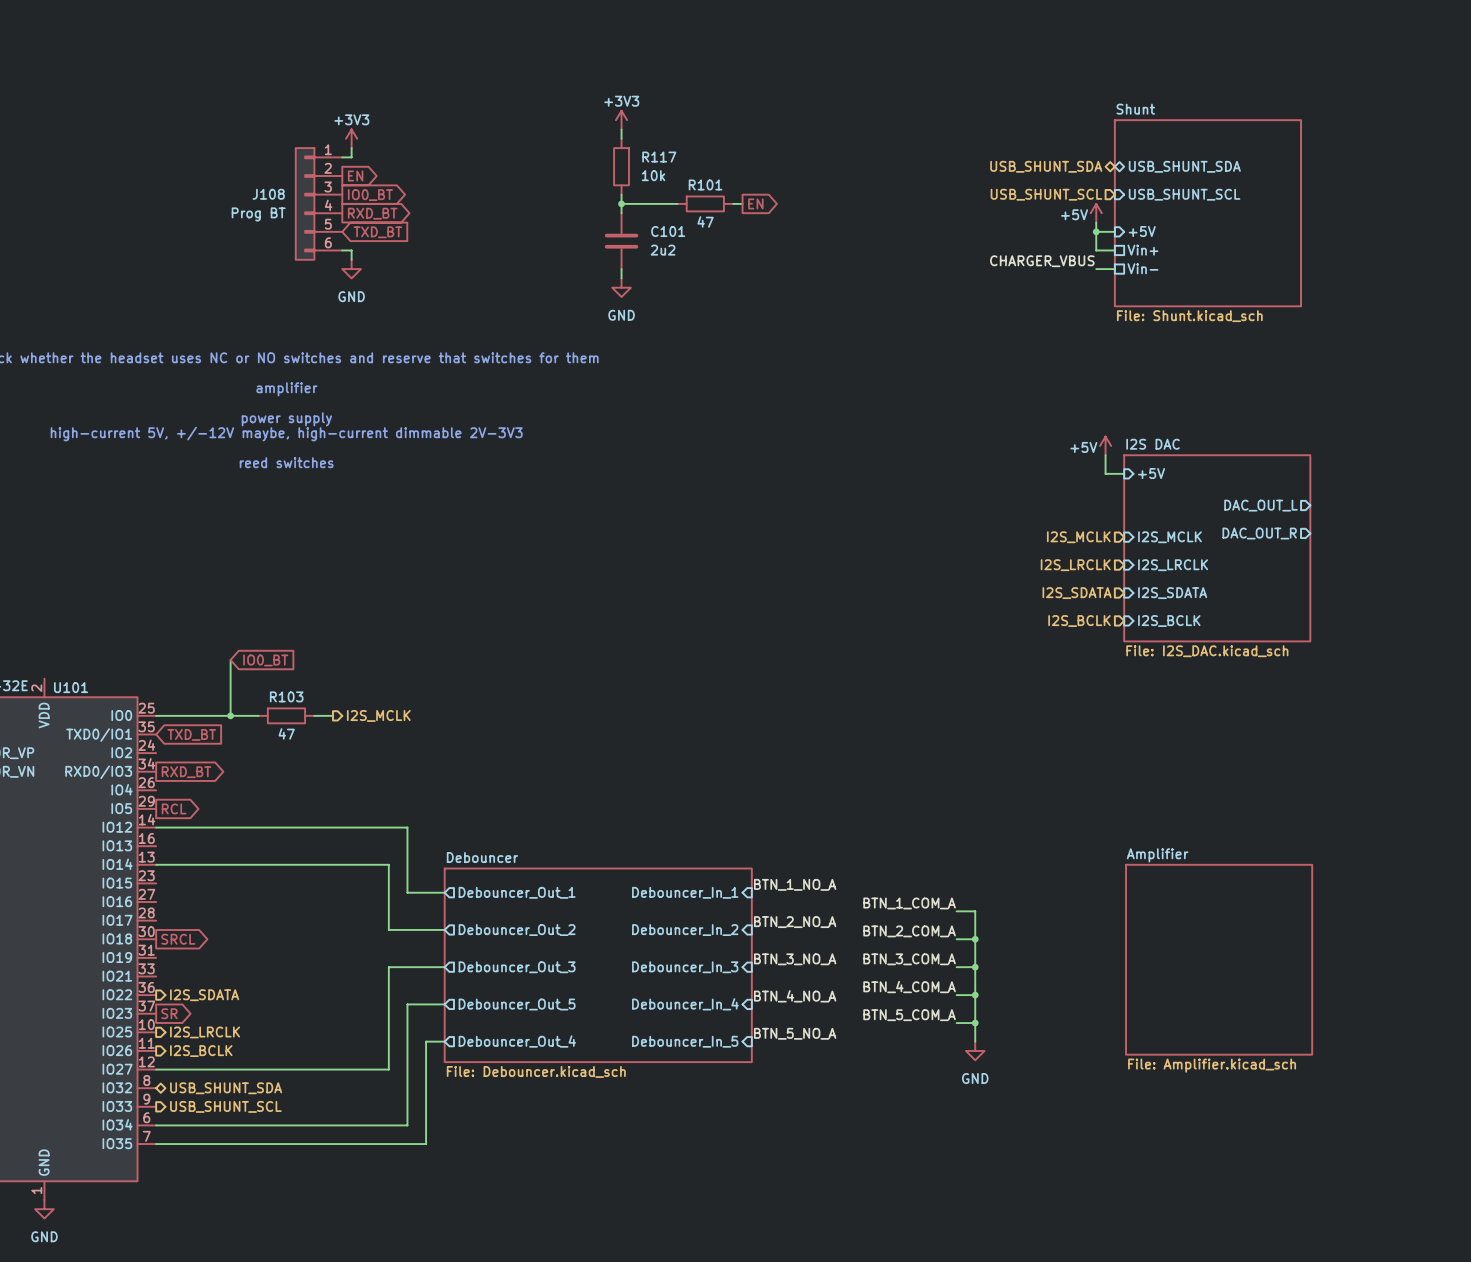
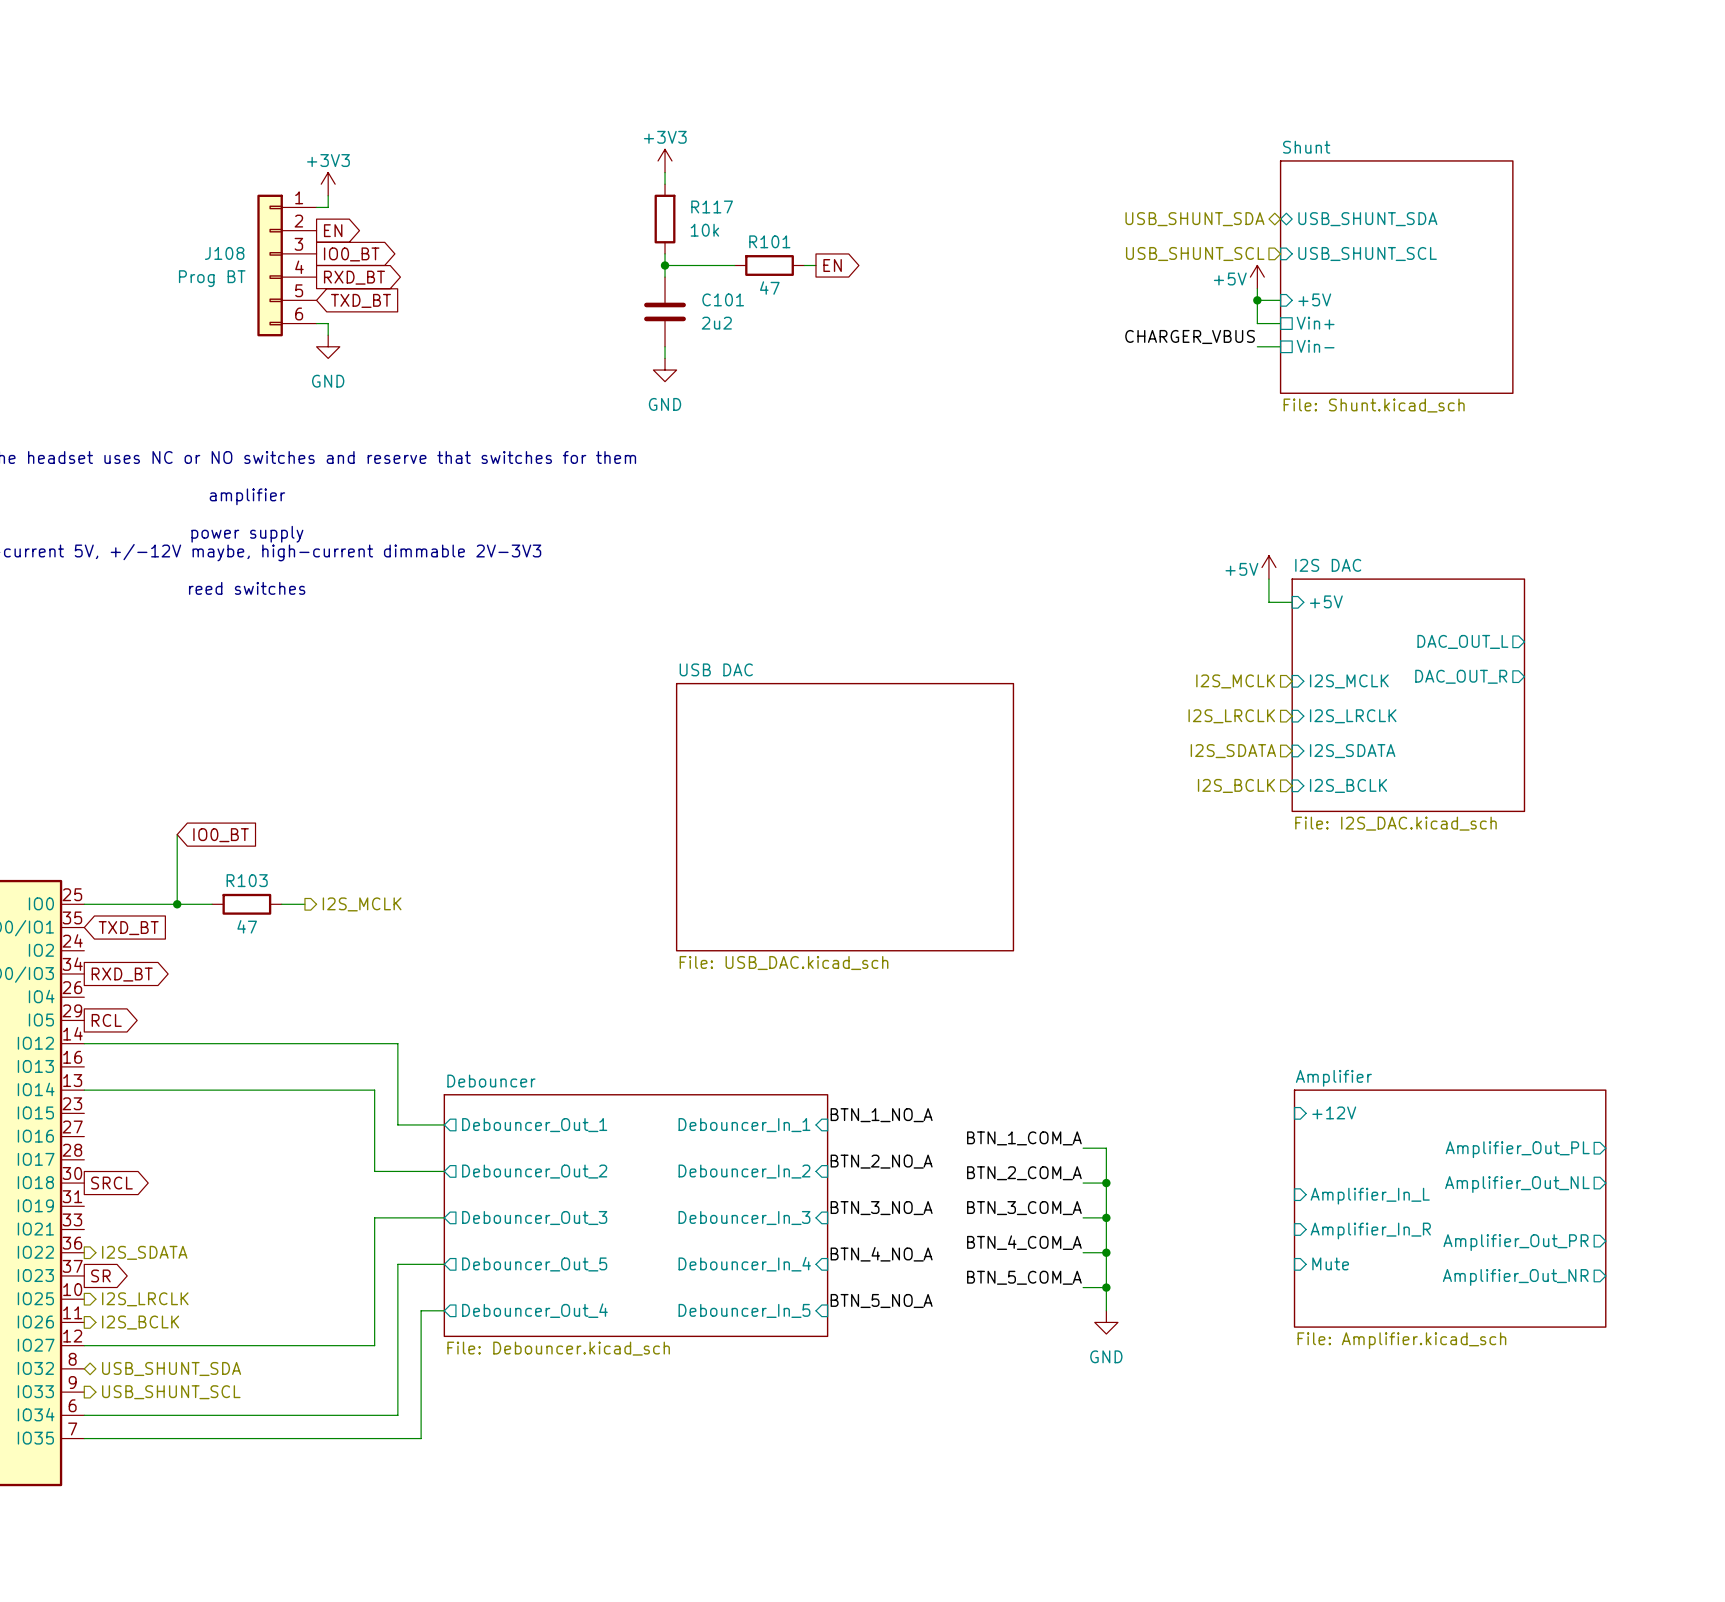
sheet USB DAC: none -> File: USB_DAC.kicad_sch (845, 817)
sheet pin: none -> +12V (1334, 1112)
sheet pin: none -> Amplifier_Out_PL (1517, 1149)
sheet pin: none -> Amplifier_Out_NL (1517, 1184)
sheet pin: none -> Amplifier_In_L (1370, 1196)
sheet Amplifier: File: Amplifier.kicad_sch (1219, 959) -> none
sheet Amplifier: none -> File: Amplifier.kicad_sch (1450, 1208)
sheet pin: none -> Amplifier_In_R (1370, 1231)
sheet pin: none -> Amplifier_Out_PR (1516, 1242)
sheet pin: none -> Mute (1330, 1263)
sheet pin: none -> Amplifier_Out_NR (1515, 1277)

